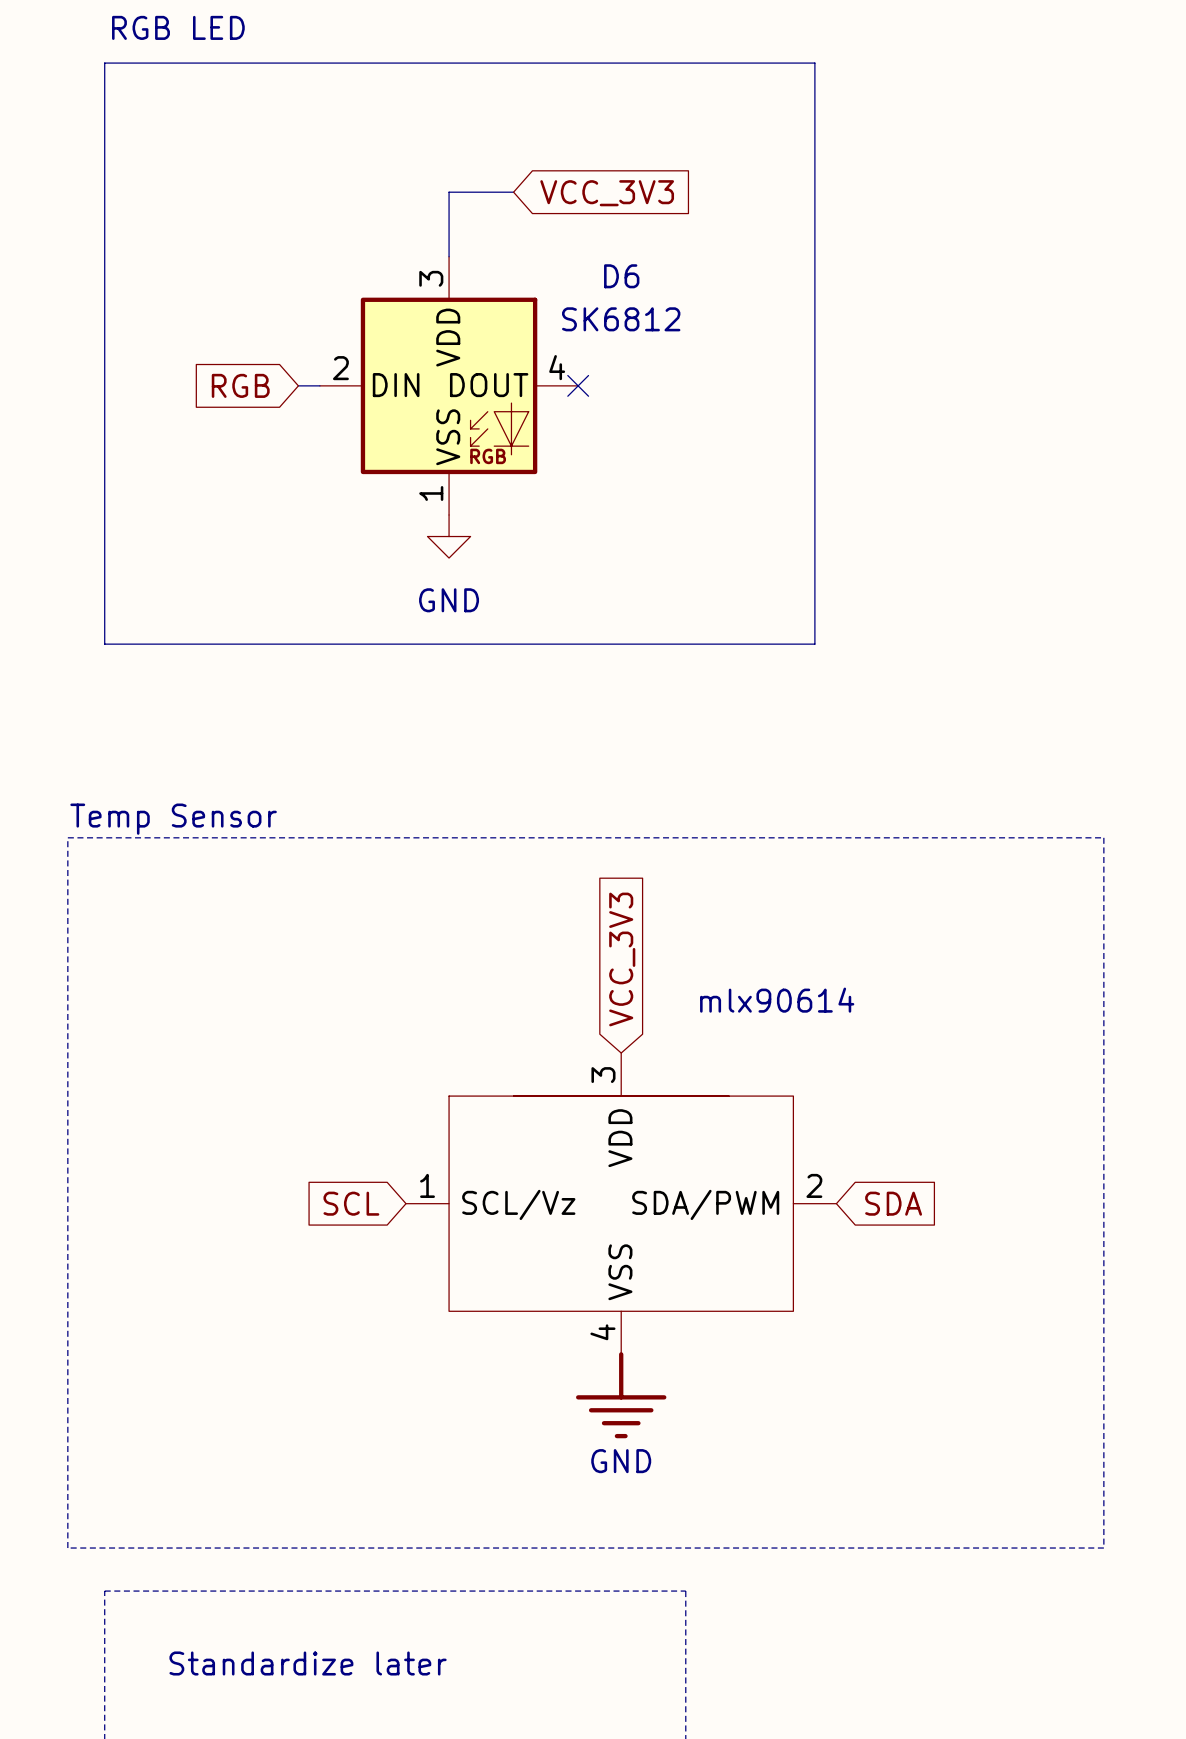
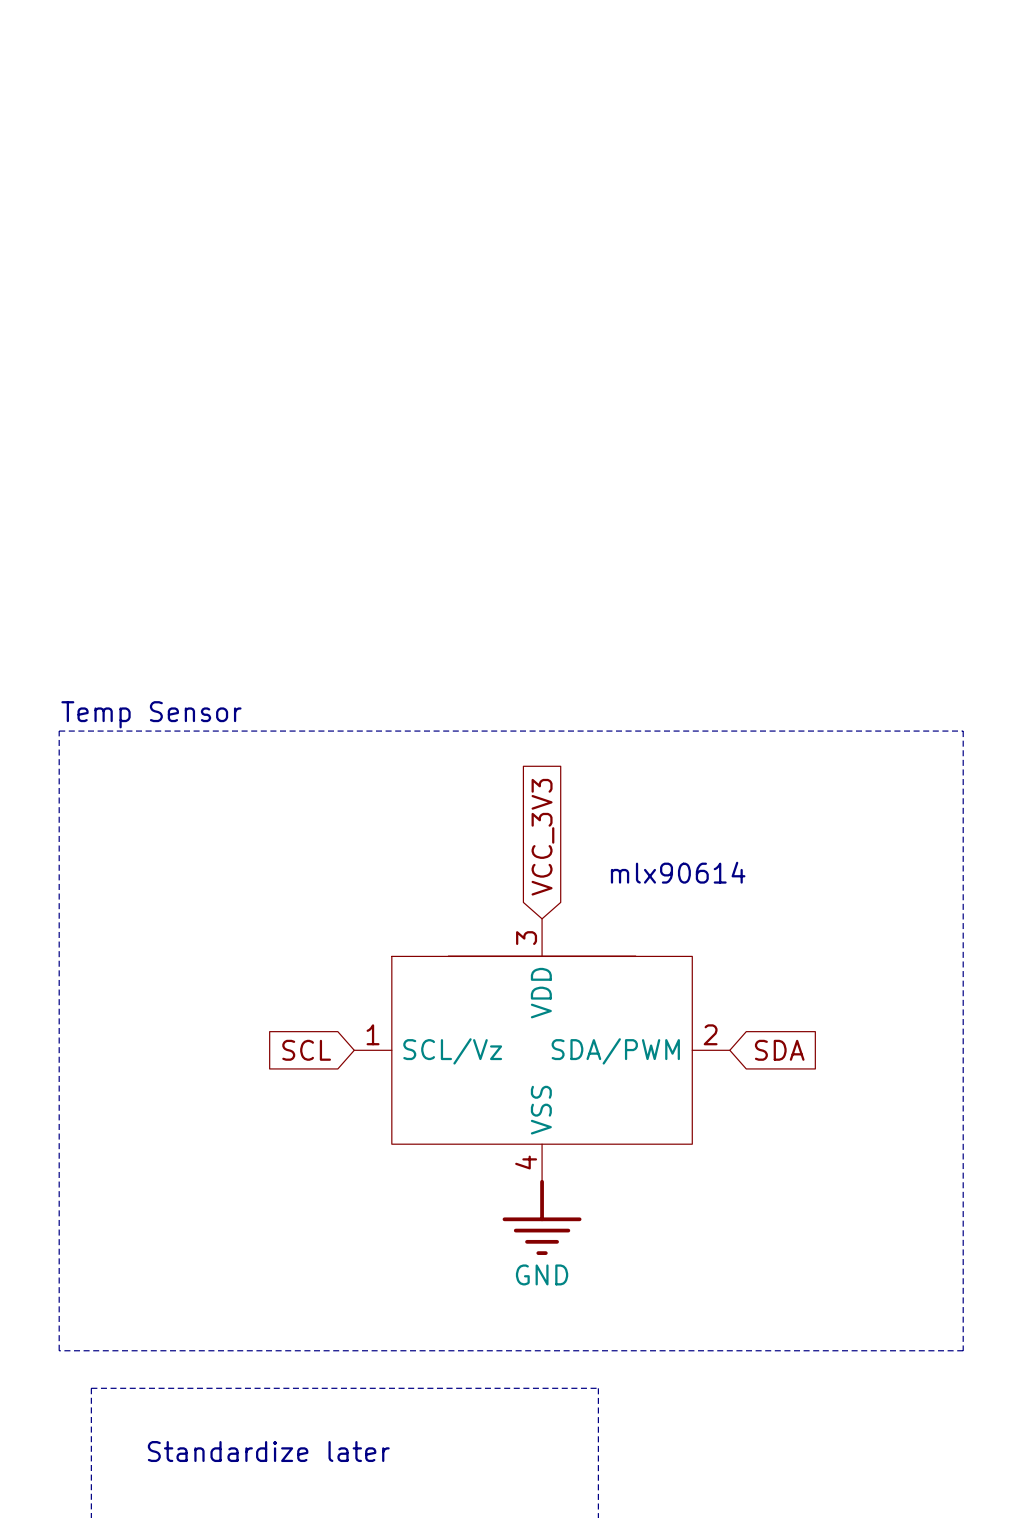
text: RGB LED (178, 27) -> none
line: (104, 63) (814, 63) (814, 644) (104, 644) (104, 63) -> none
wire: (513, 192) (449, 192) (449, 256) -> none
global label: VCC_3V3 (607, 193) -> none
global label: RGB (240, 385) -> none
wire: (298, 385) (319, 385) -> none
D6: SK6812 (449, 385) -> none
no-connect mark: (578, 385) -> none
power symbol: GND (449, 536) -> none

